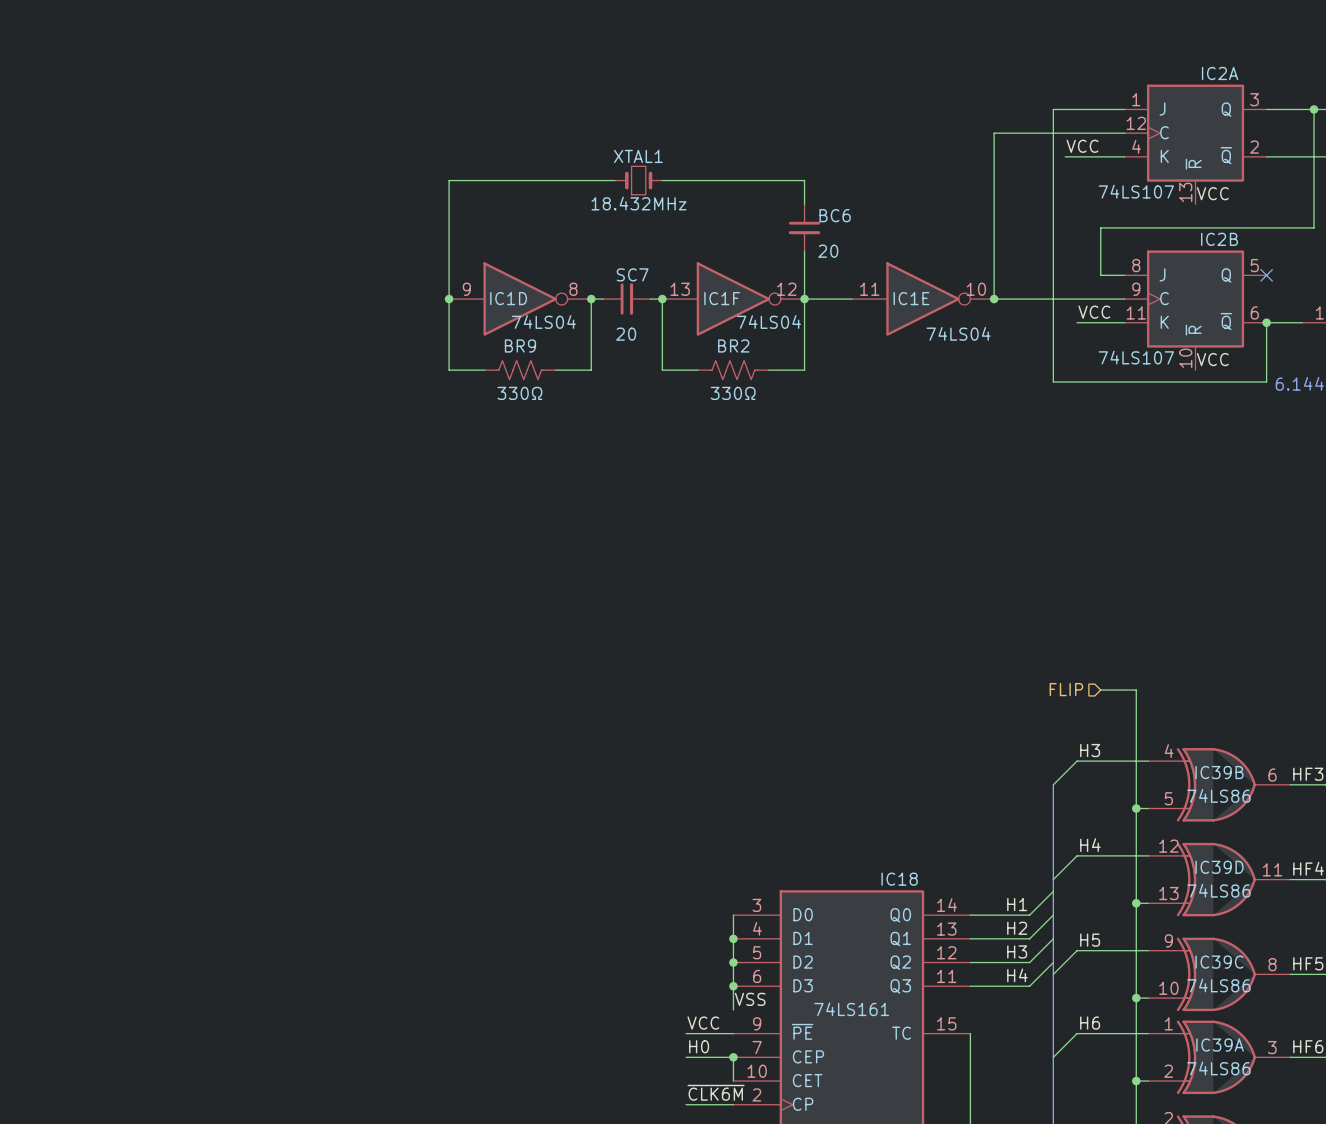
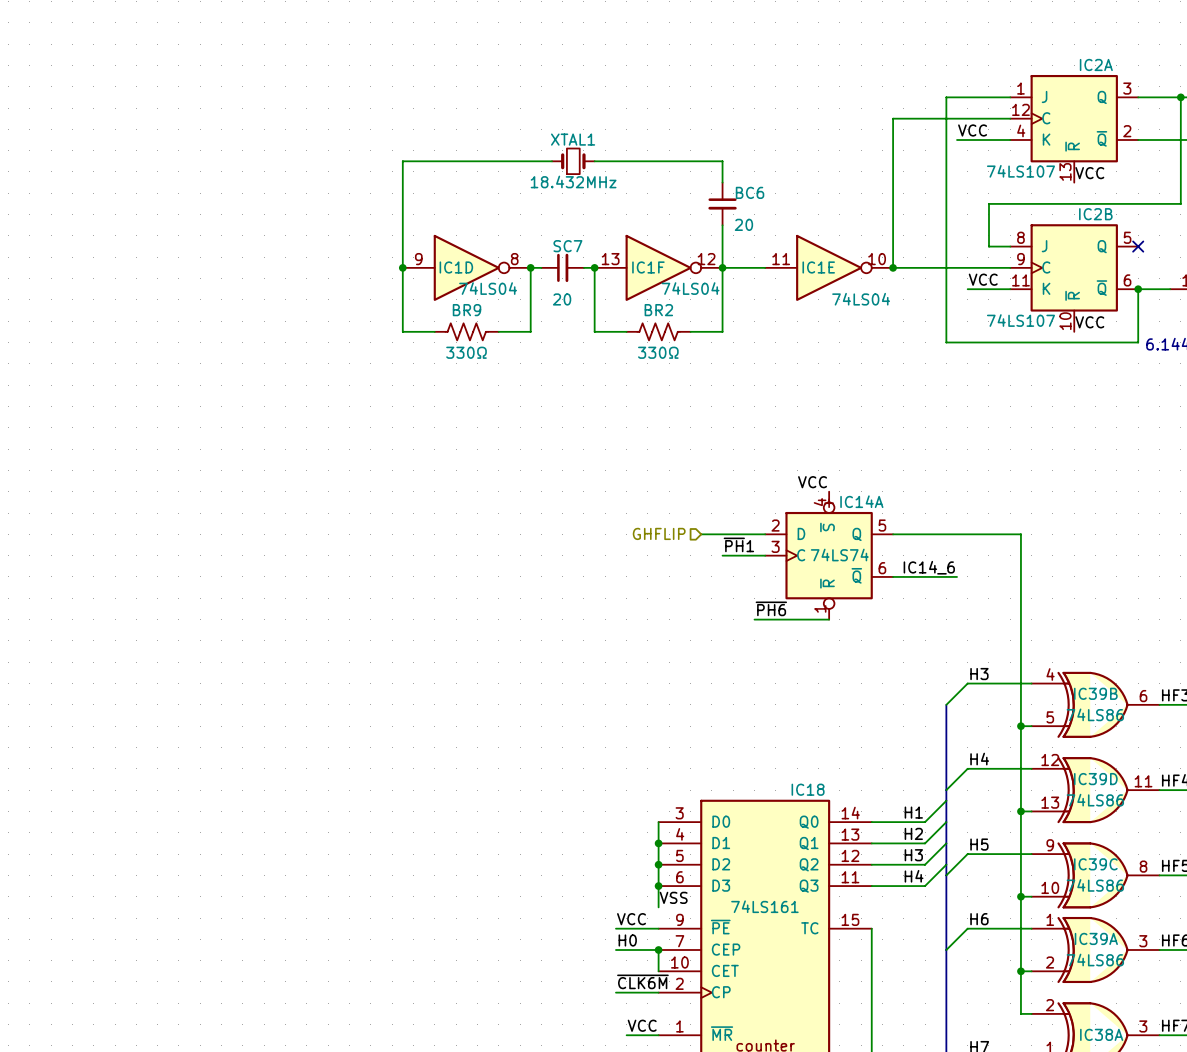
label: none -> VCC (812, 482)
hierarchical label: none -> GHFLIP (659, 533)
wire: none -> (701, 534) (765, 534)
label: none -> ~{PH}1 (738, 544)
wire: none -> (722, 555) (765, 555)
IC14A: none -> 74LS74 (829, 555)
label: none -> IC14_6 (929, 567)
wire: none -> (893, 576) (957, 576)
label: none -> ~{PH6} (771, 608)
hierarchical label: FLIP (1066, 689) -> none
wire: none -> (754, 619) (829, 619)
wire: (1100, 690) (1136, 690) -> (893, 534) (1020, 534) (1020, 619)

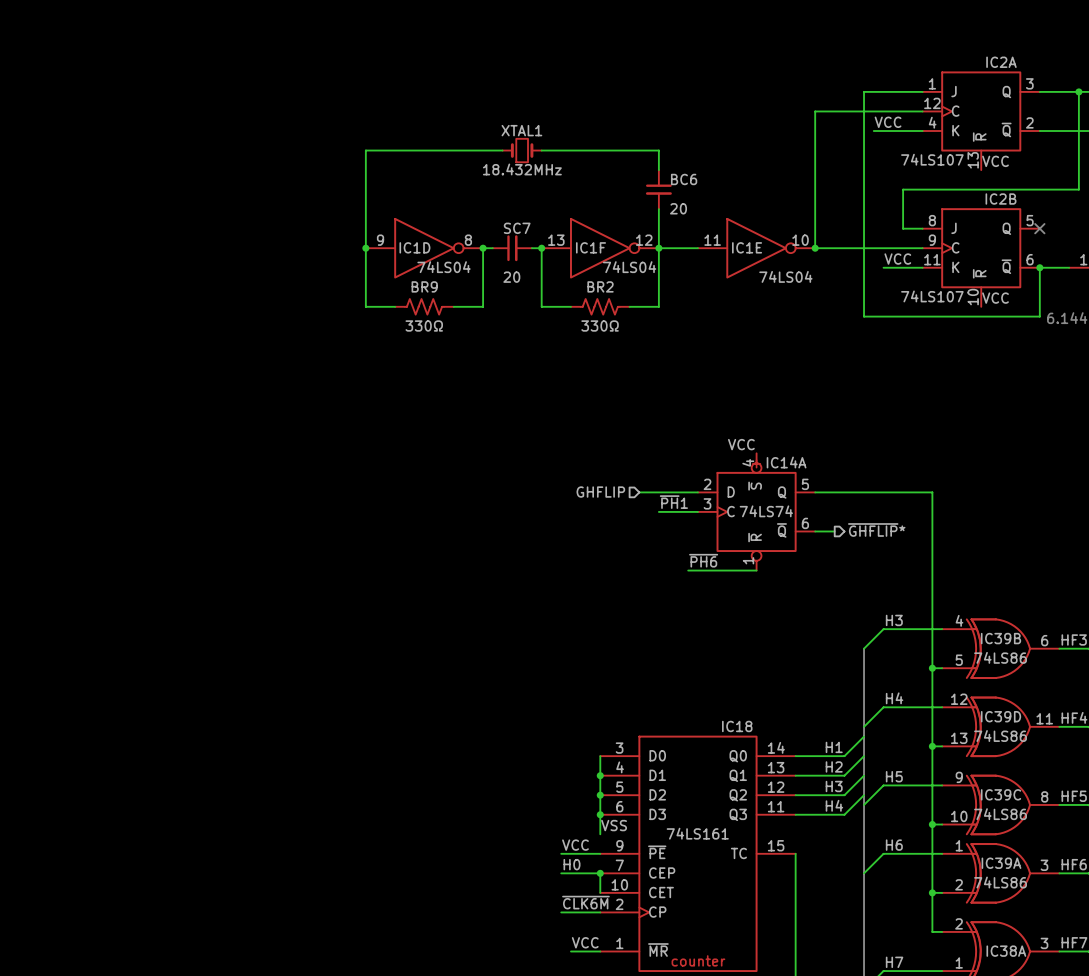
label: IC14_6 (929, 567) -> none
hierarchical label: none -> ~{GHFLIP}* (876, 529)
wire: (914, 576) (957, 576) -> none

